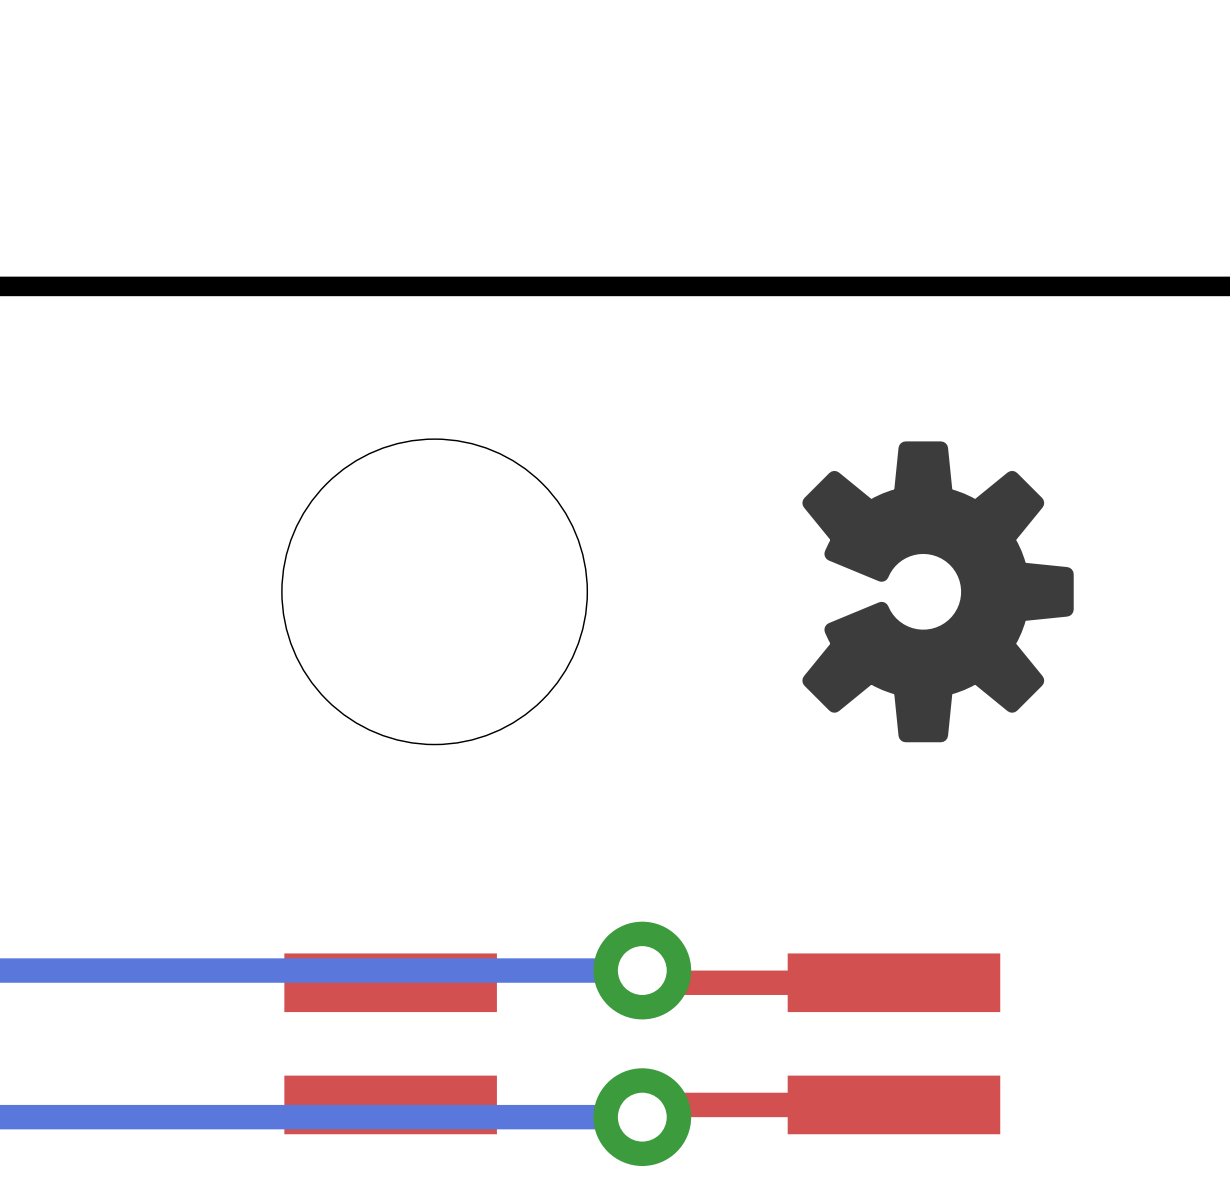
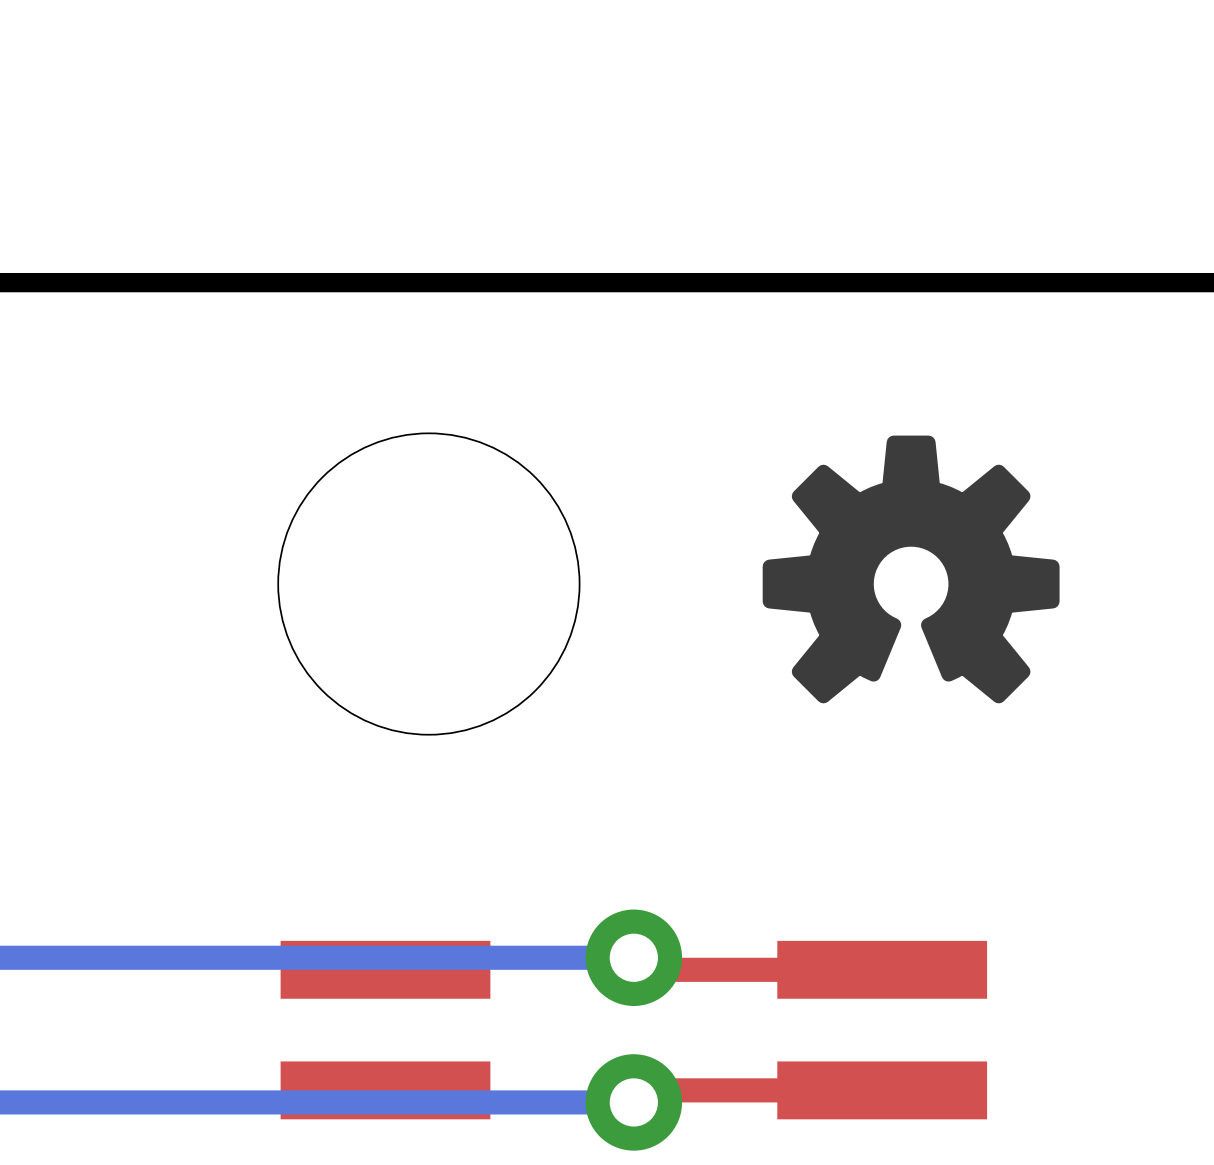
drawing shape: [802, 441, 1074, 743] -> [762, 435, 1060, 704]

